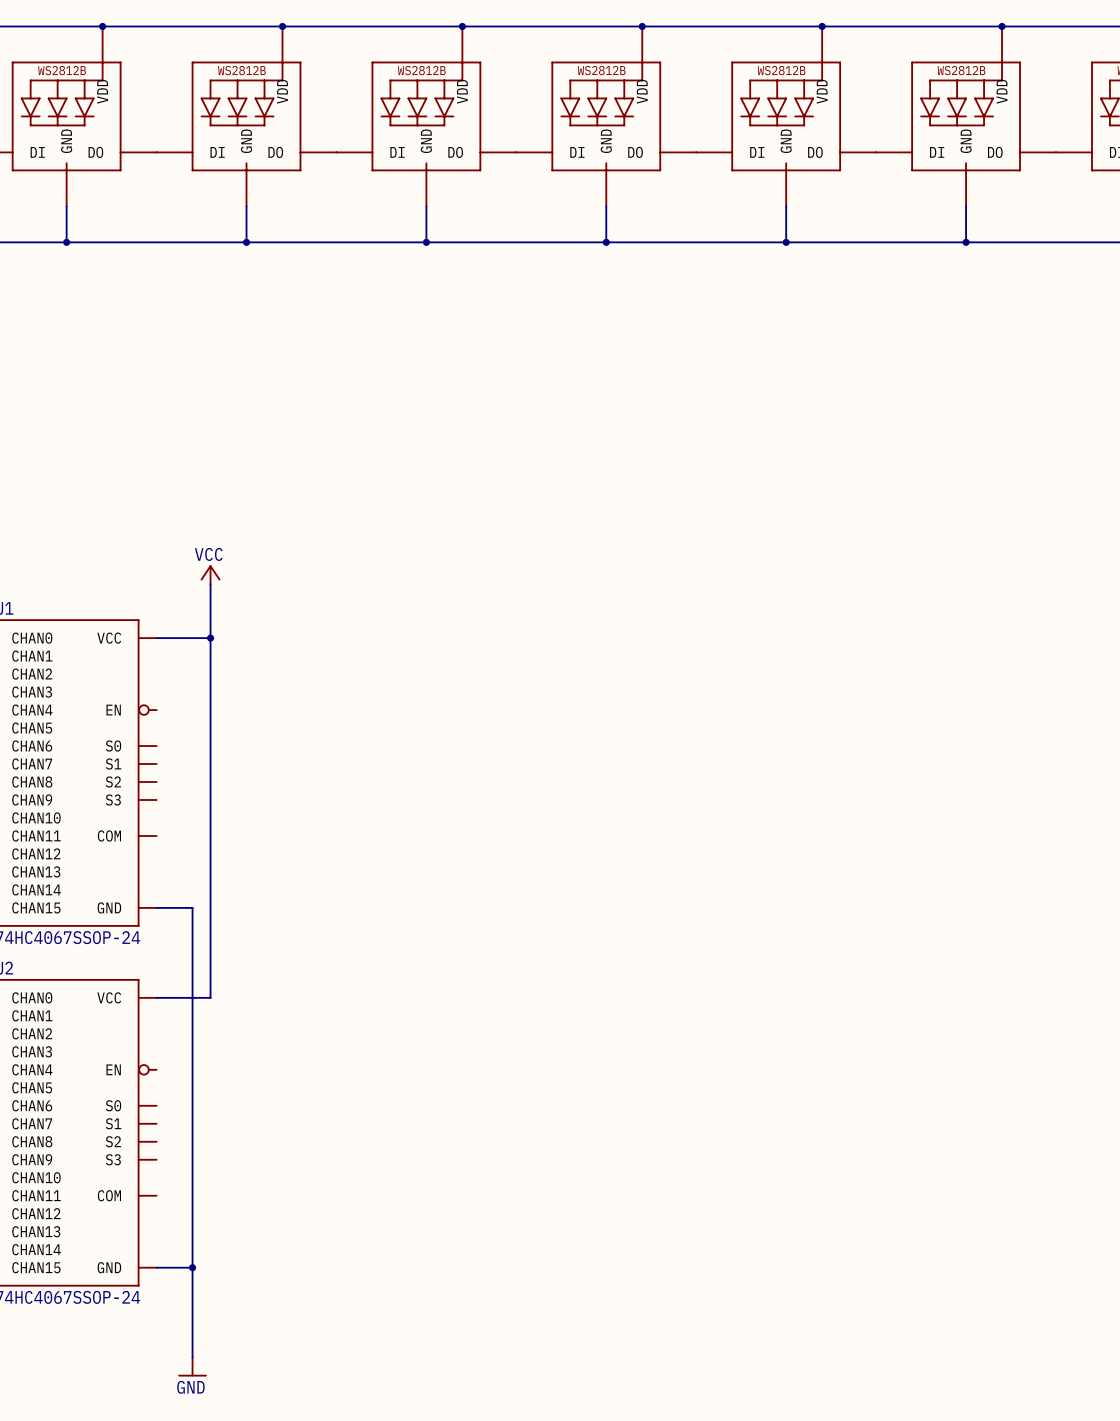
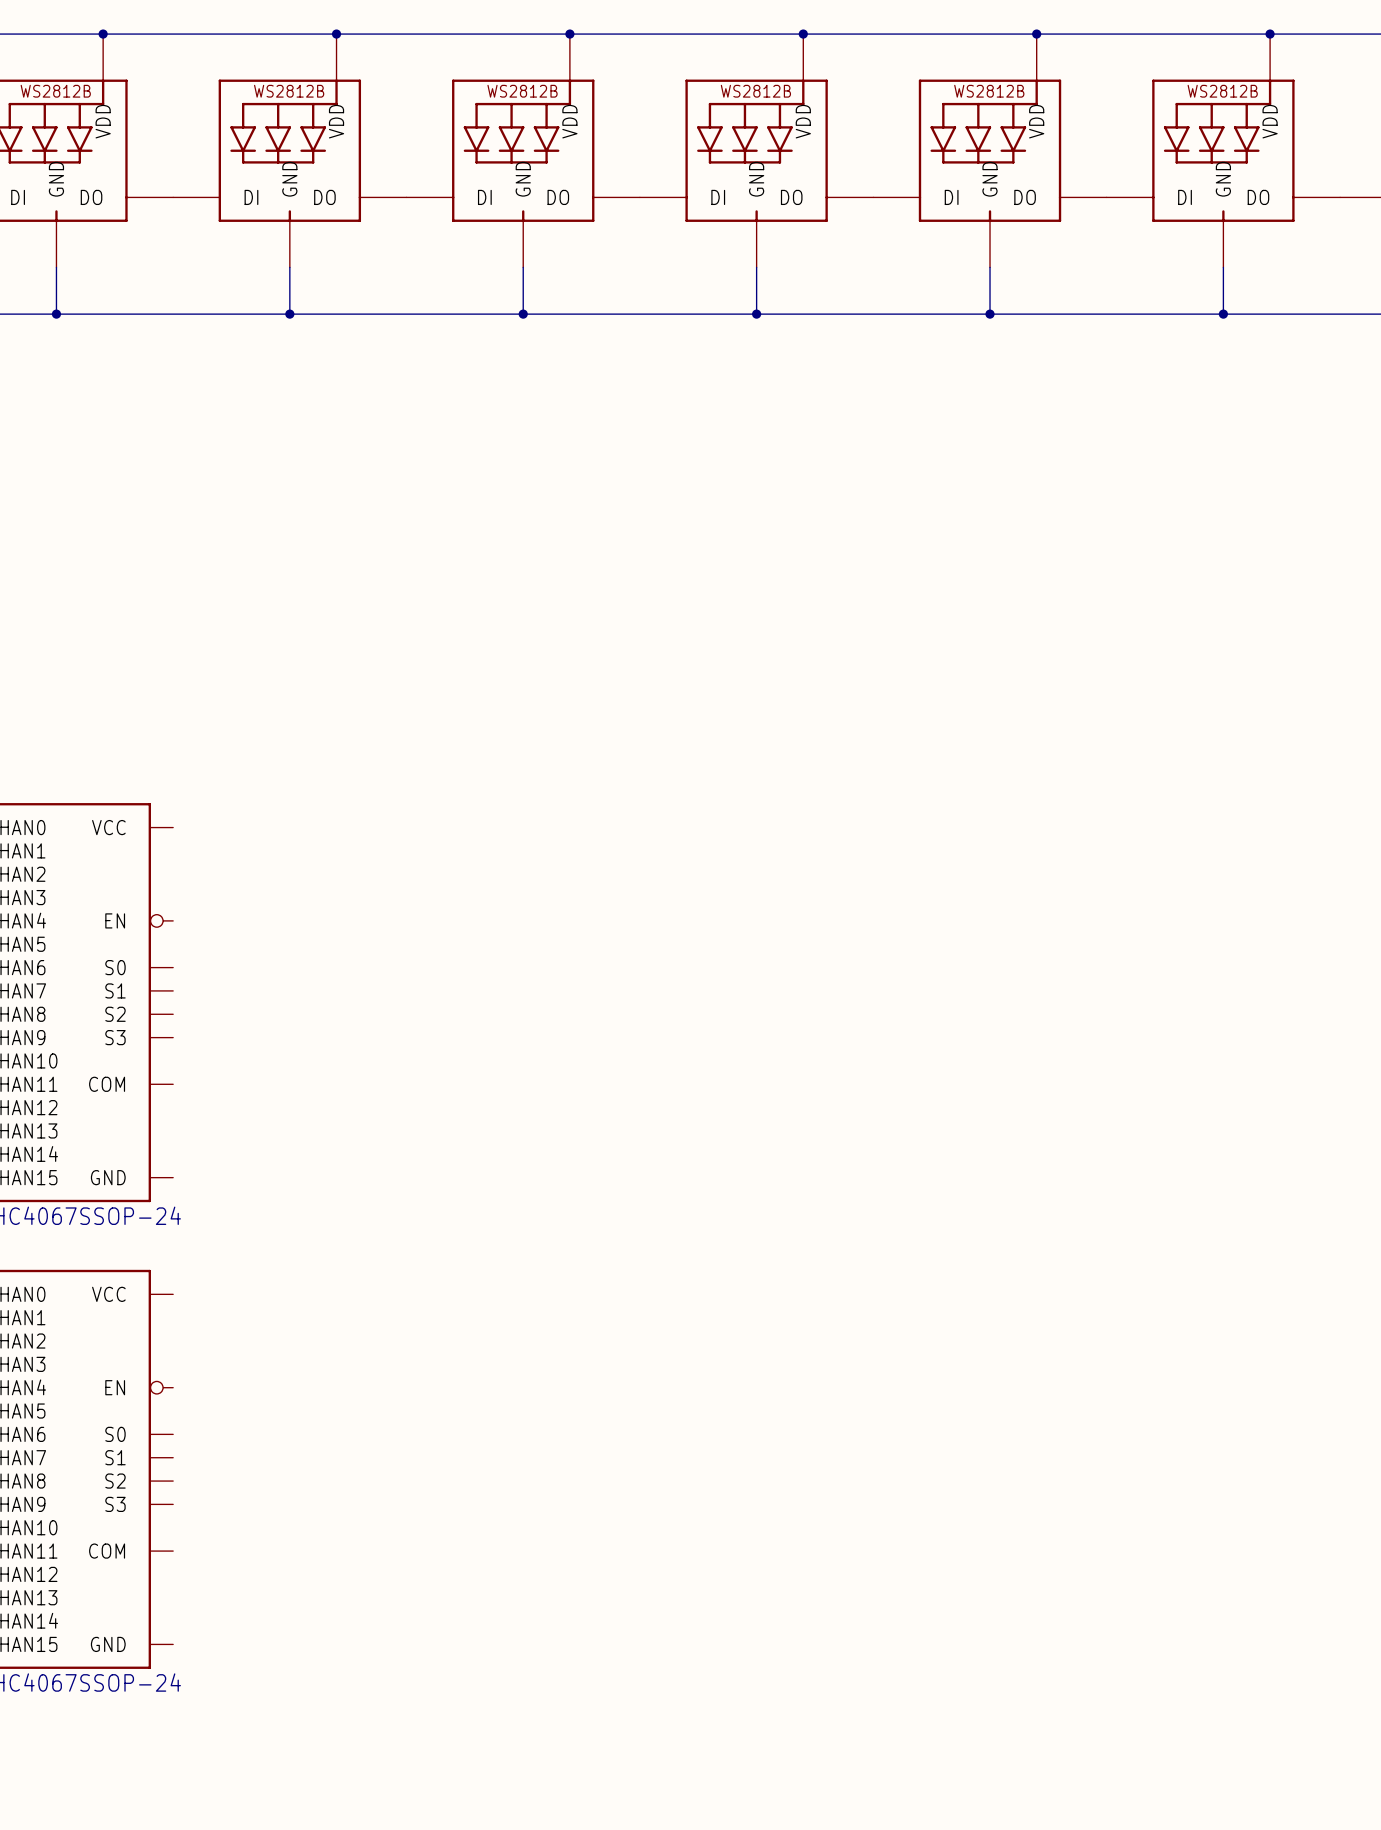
power symbol: VCC (210, 574) -> none
wire: (210, 584) (210, 997) (156, 997) -> none
wire: (156, 638) (210, 638) -> none
junction: (210, 638) -> none
wire: (156, 907) (192, 907) (192, 1357) -> none
wire: (156, 1267) (192, 1267) -> none
junction: (192, 1267) -> none
power symbol: GND (192, 1367) -> none

